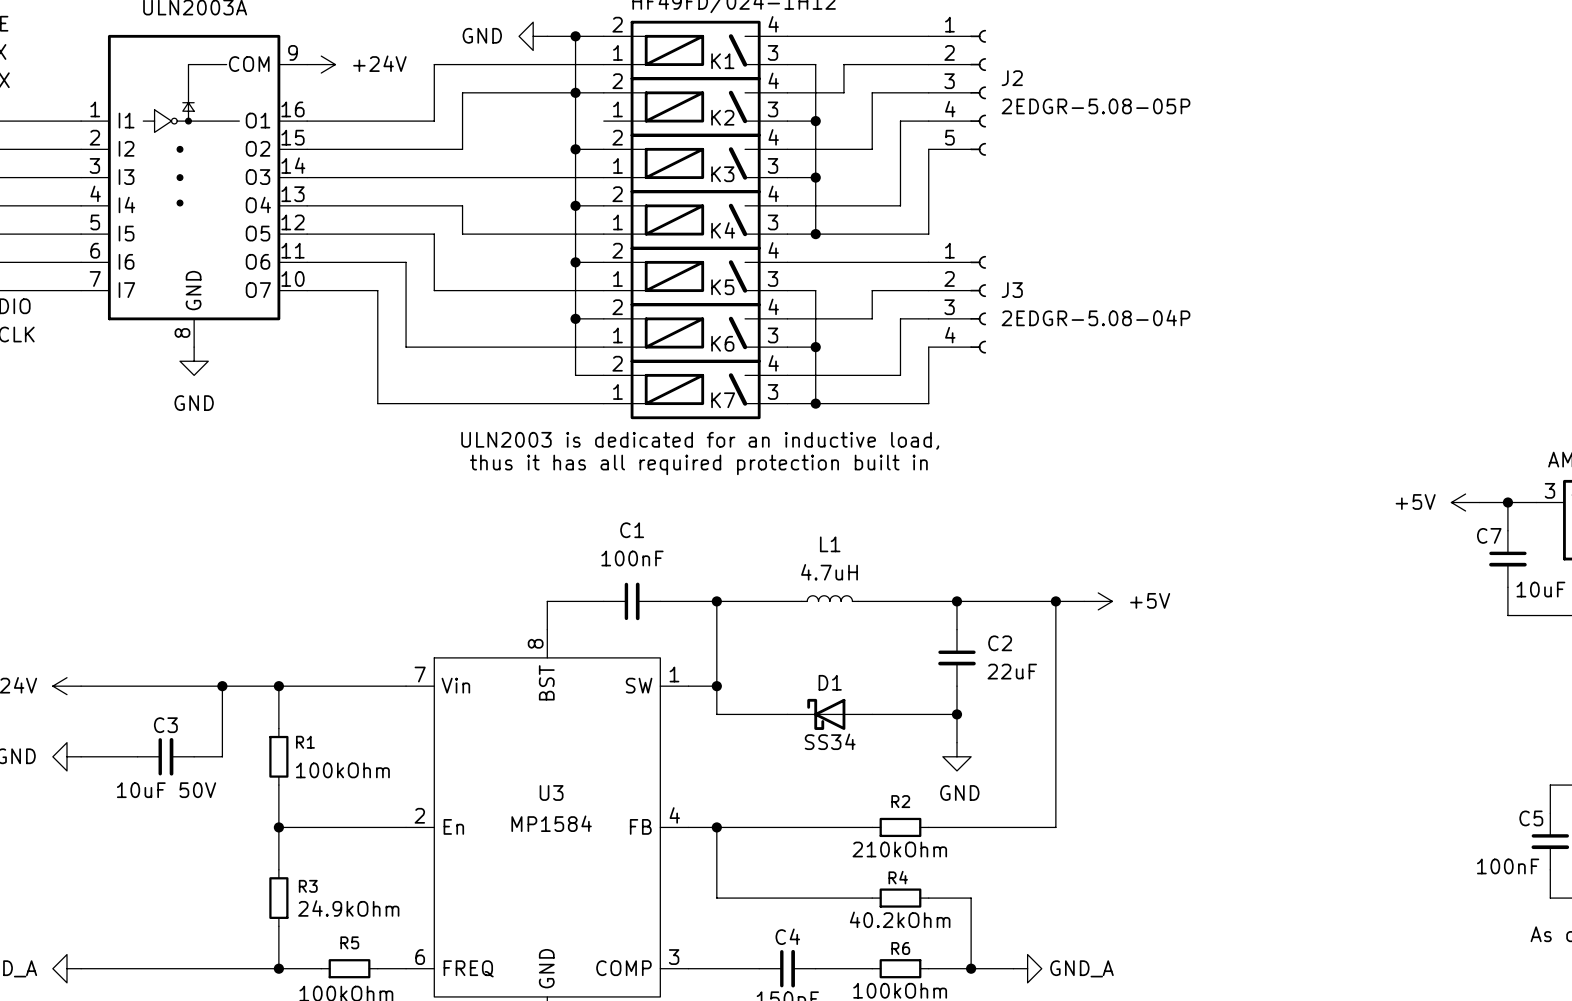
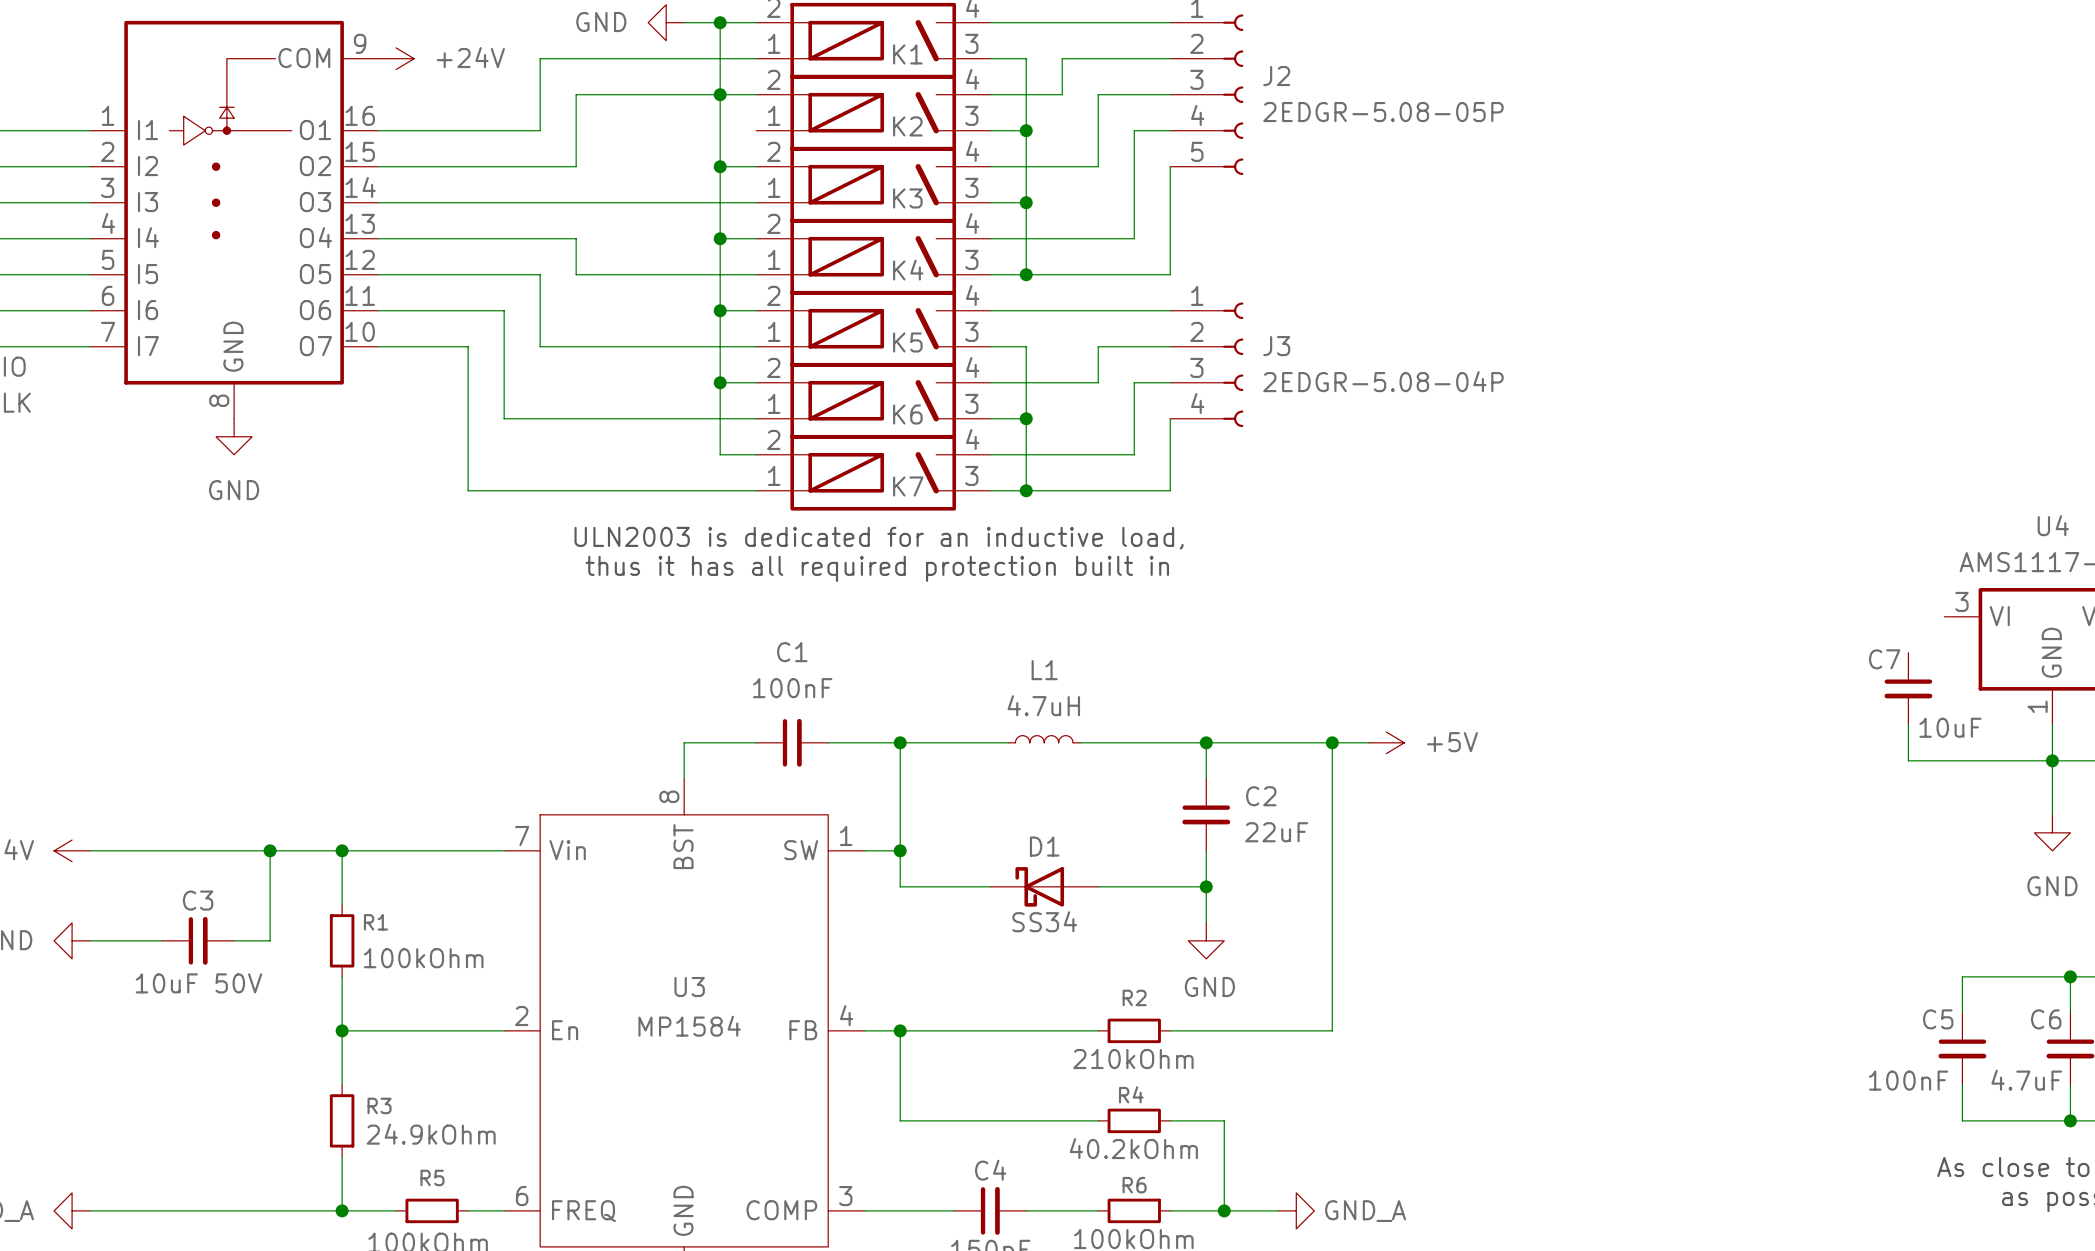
power symbol: +5V (1465, 502) -> none
wire: (1479, 502) (1536, 502) -> none
wire: (1507, 502) (1507, 530) -> none
junction: (1507, 502) -> none

